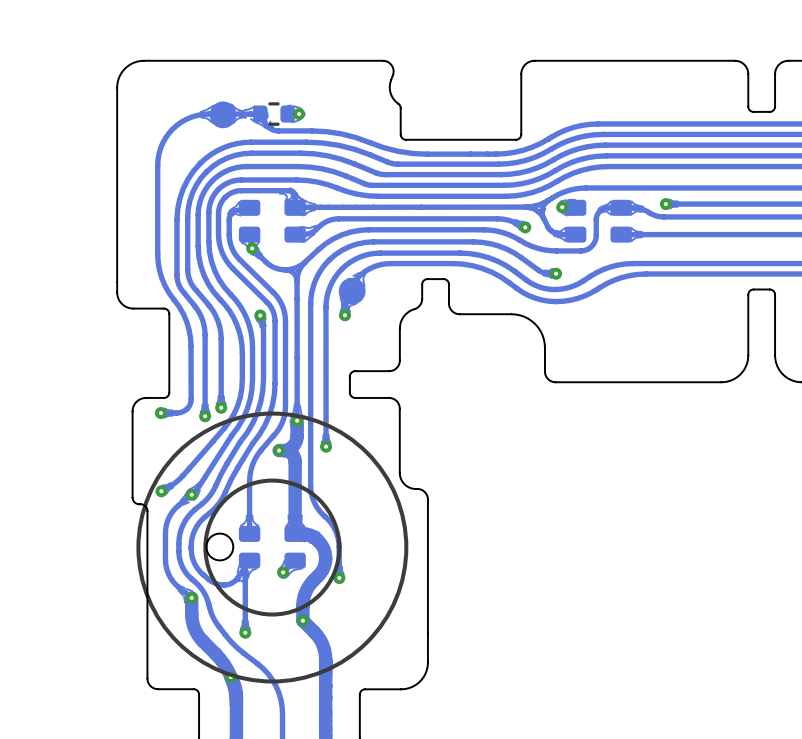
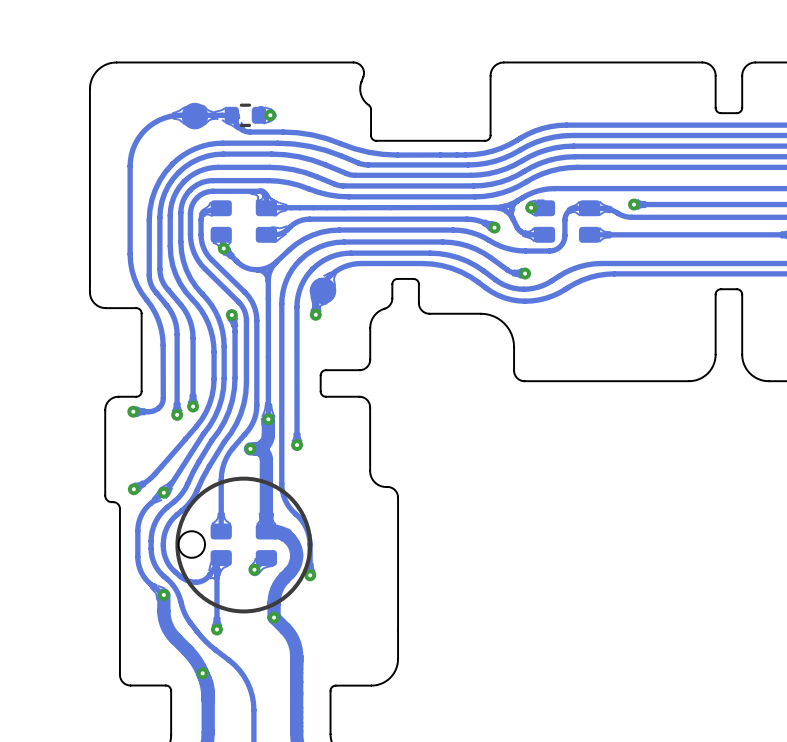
drawing: [136, 411, 409, 684] -> none

